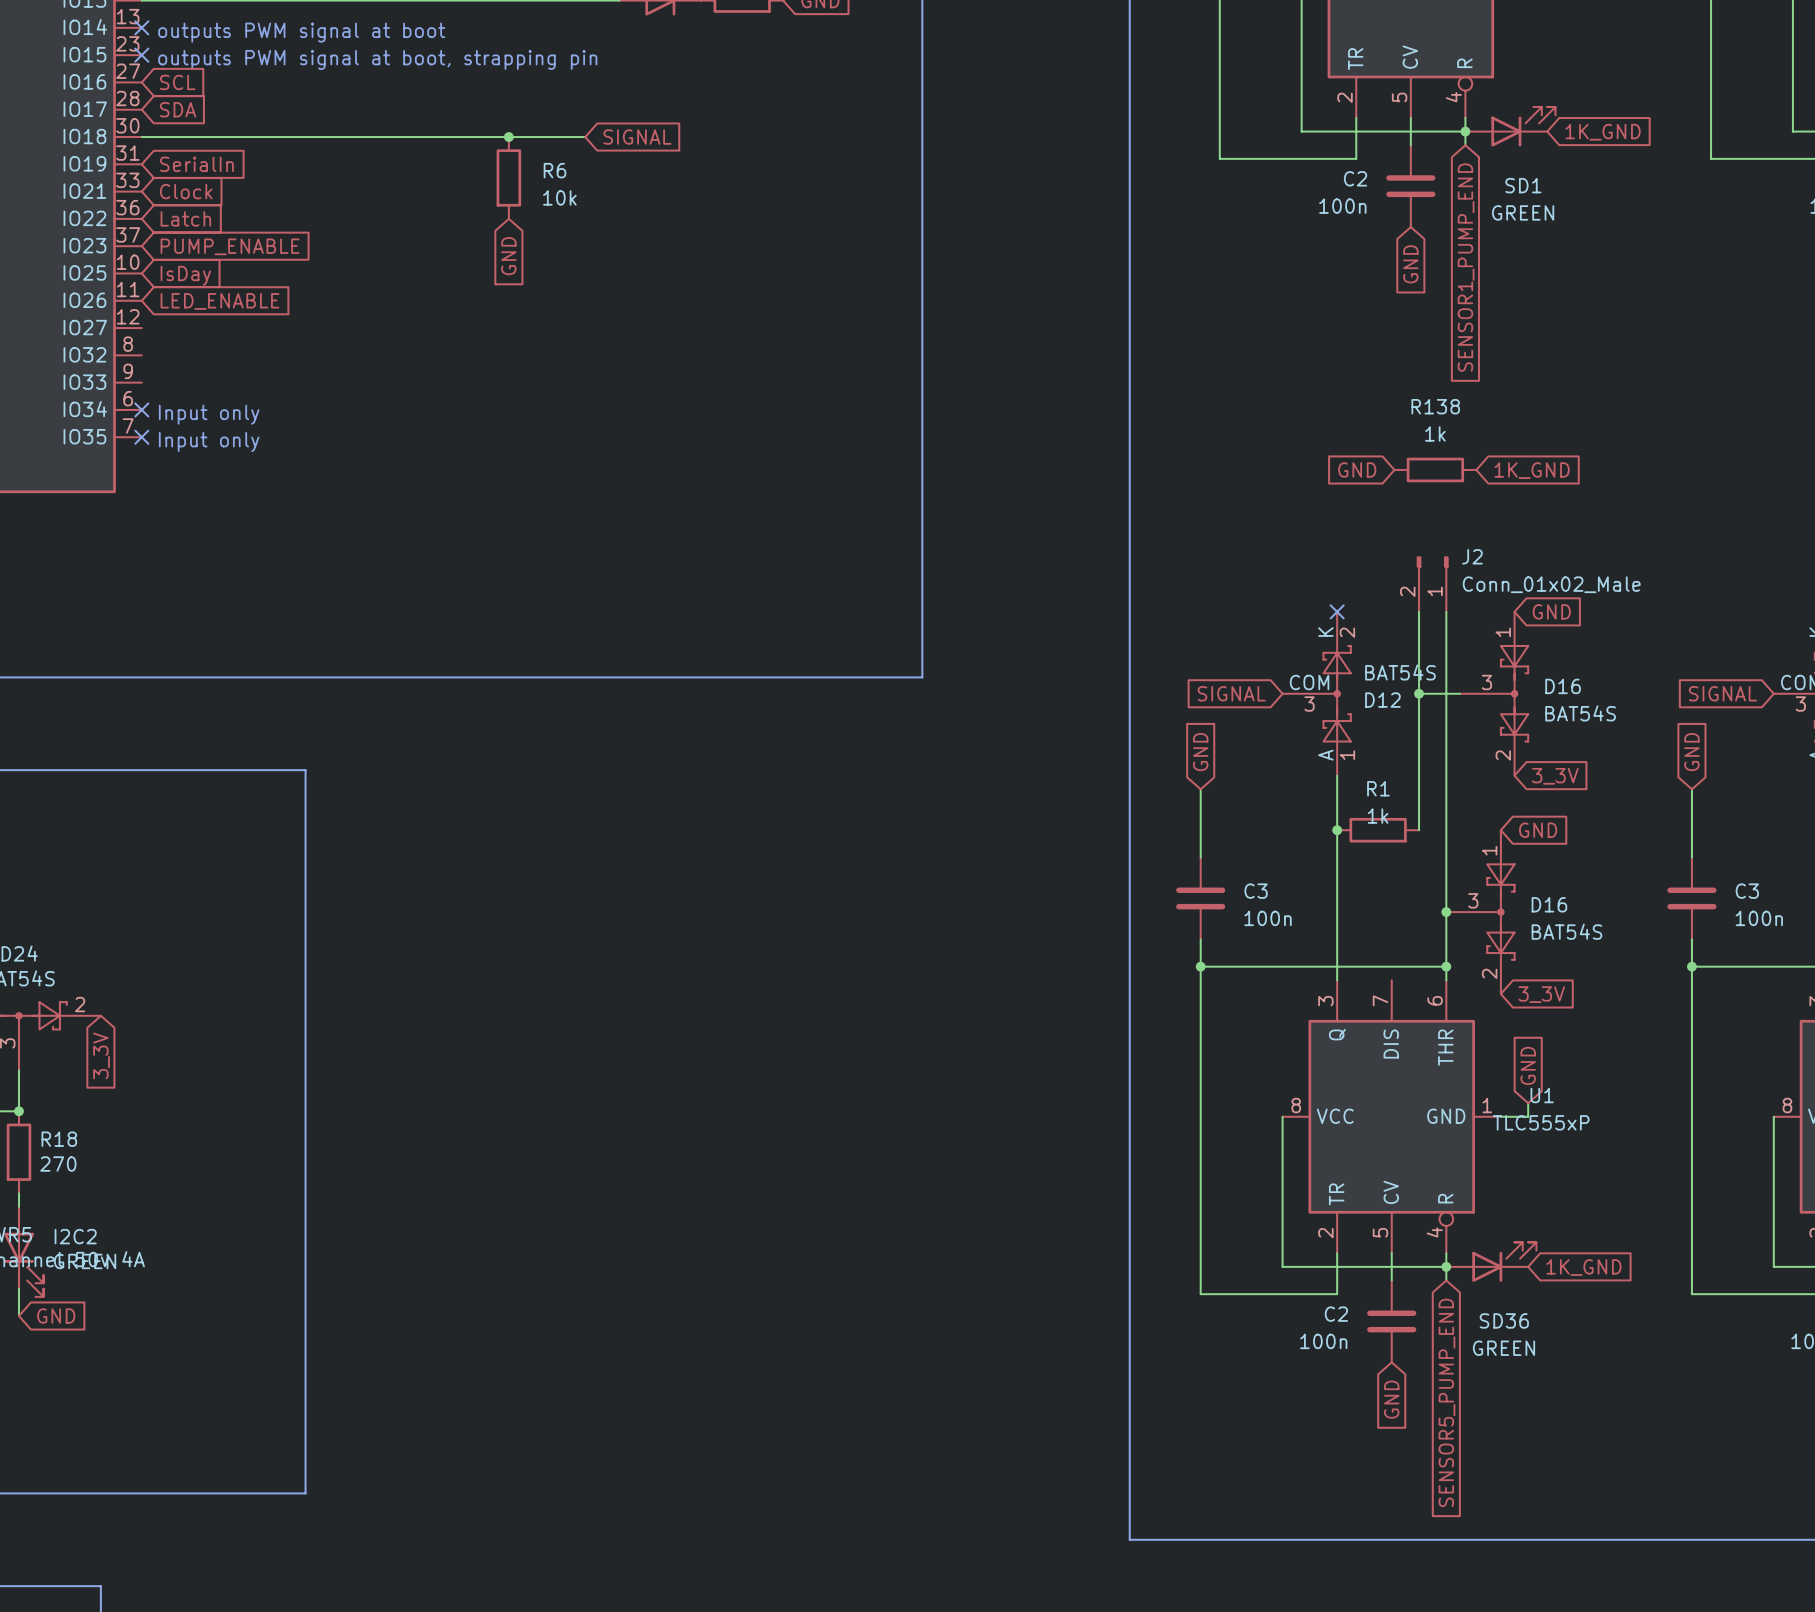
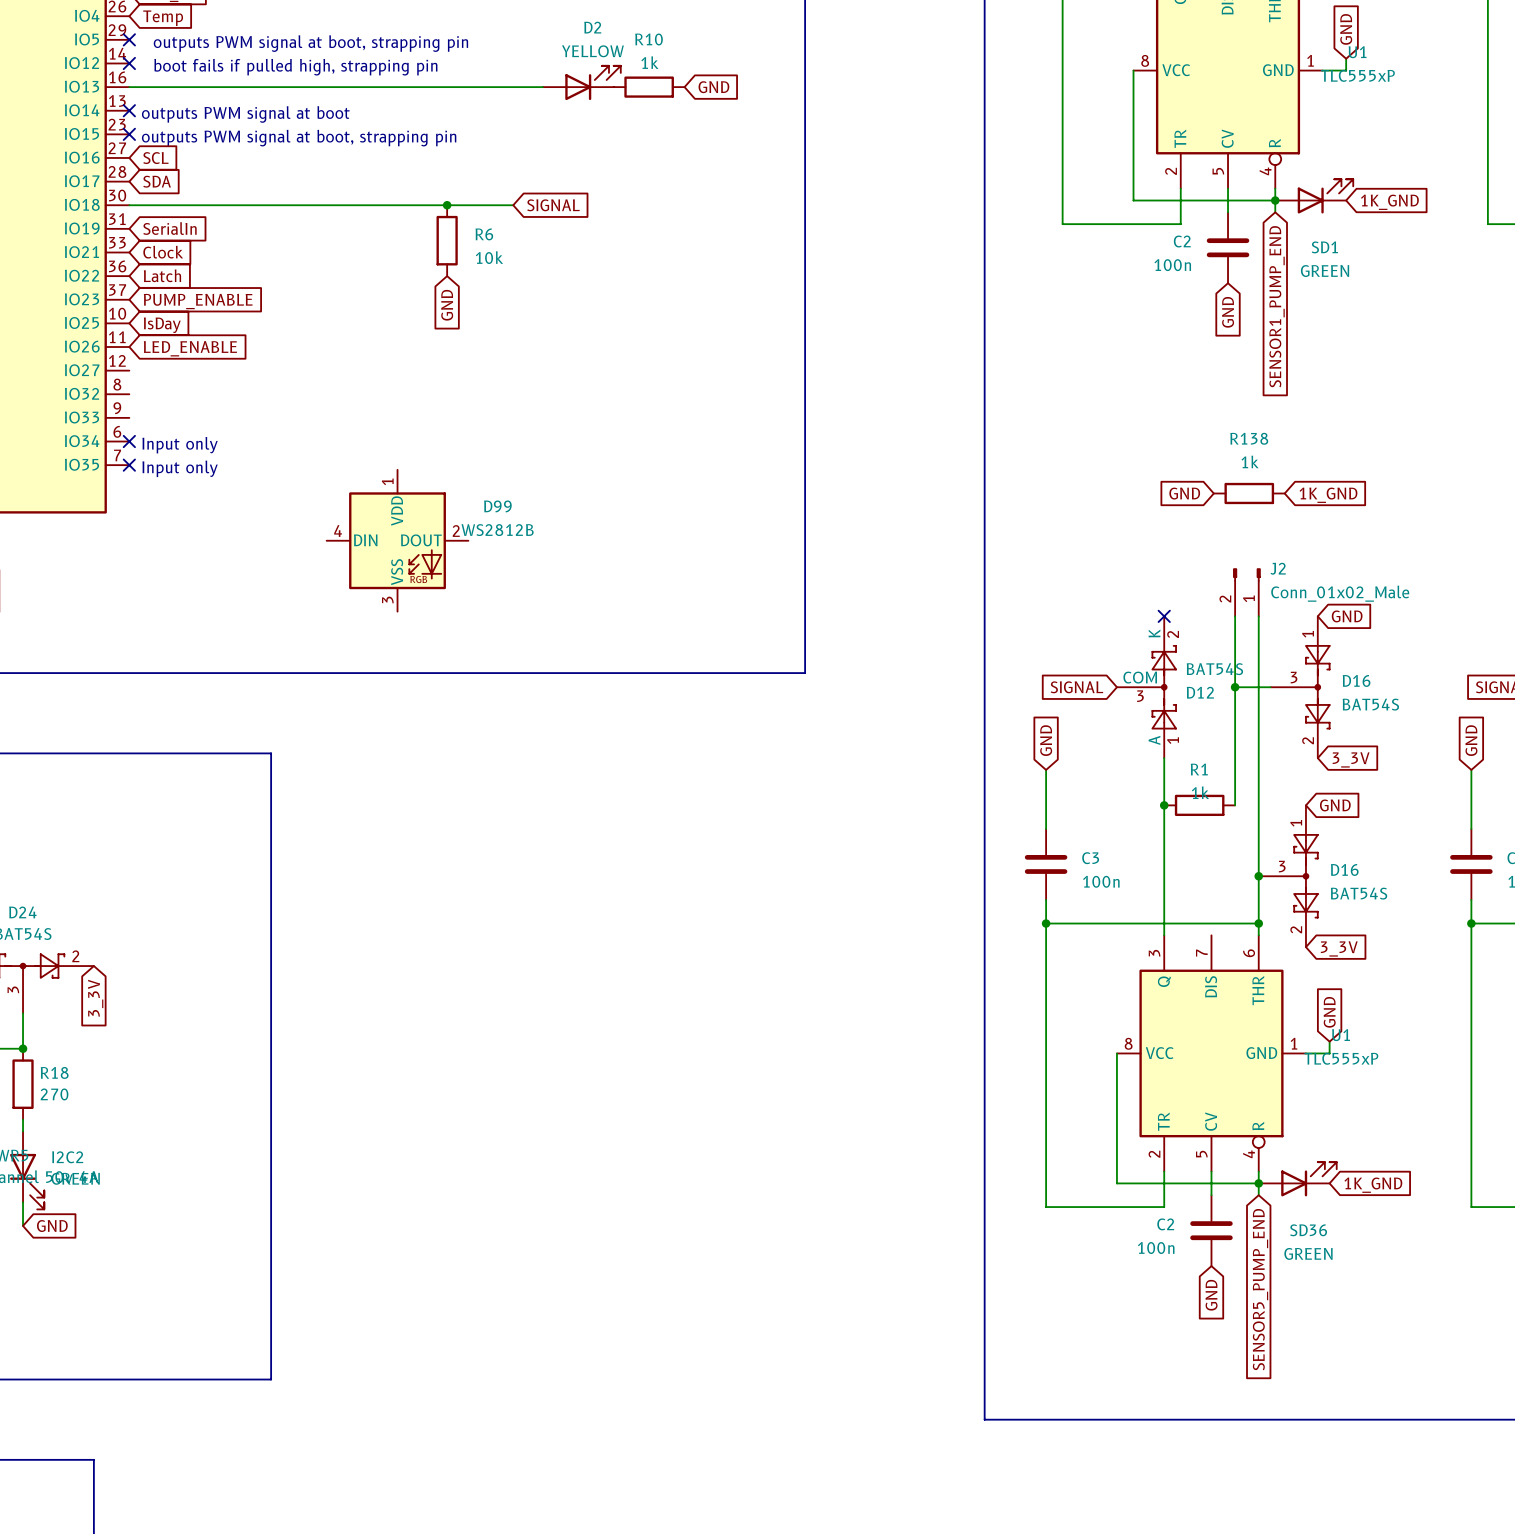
D99: none -> WS2812B (397, 540)

